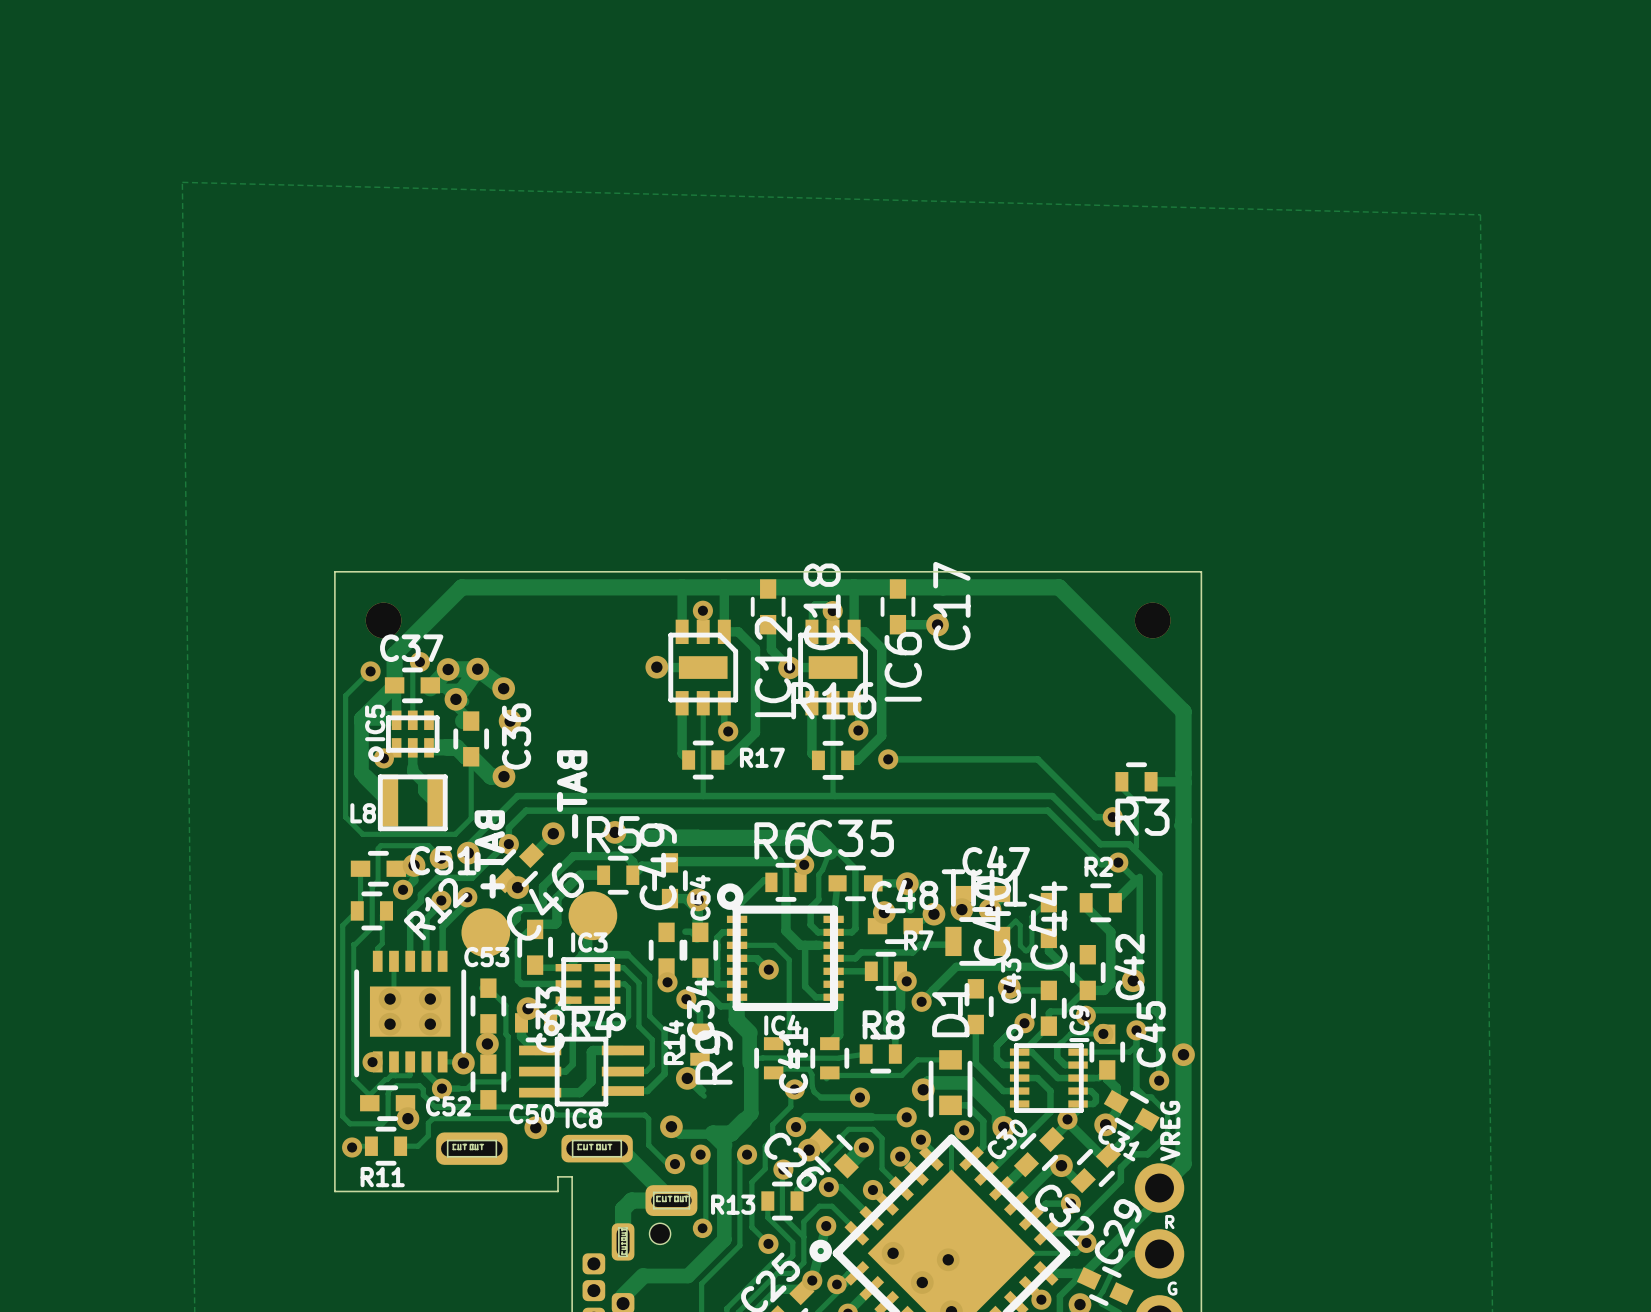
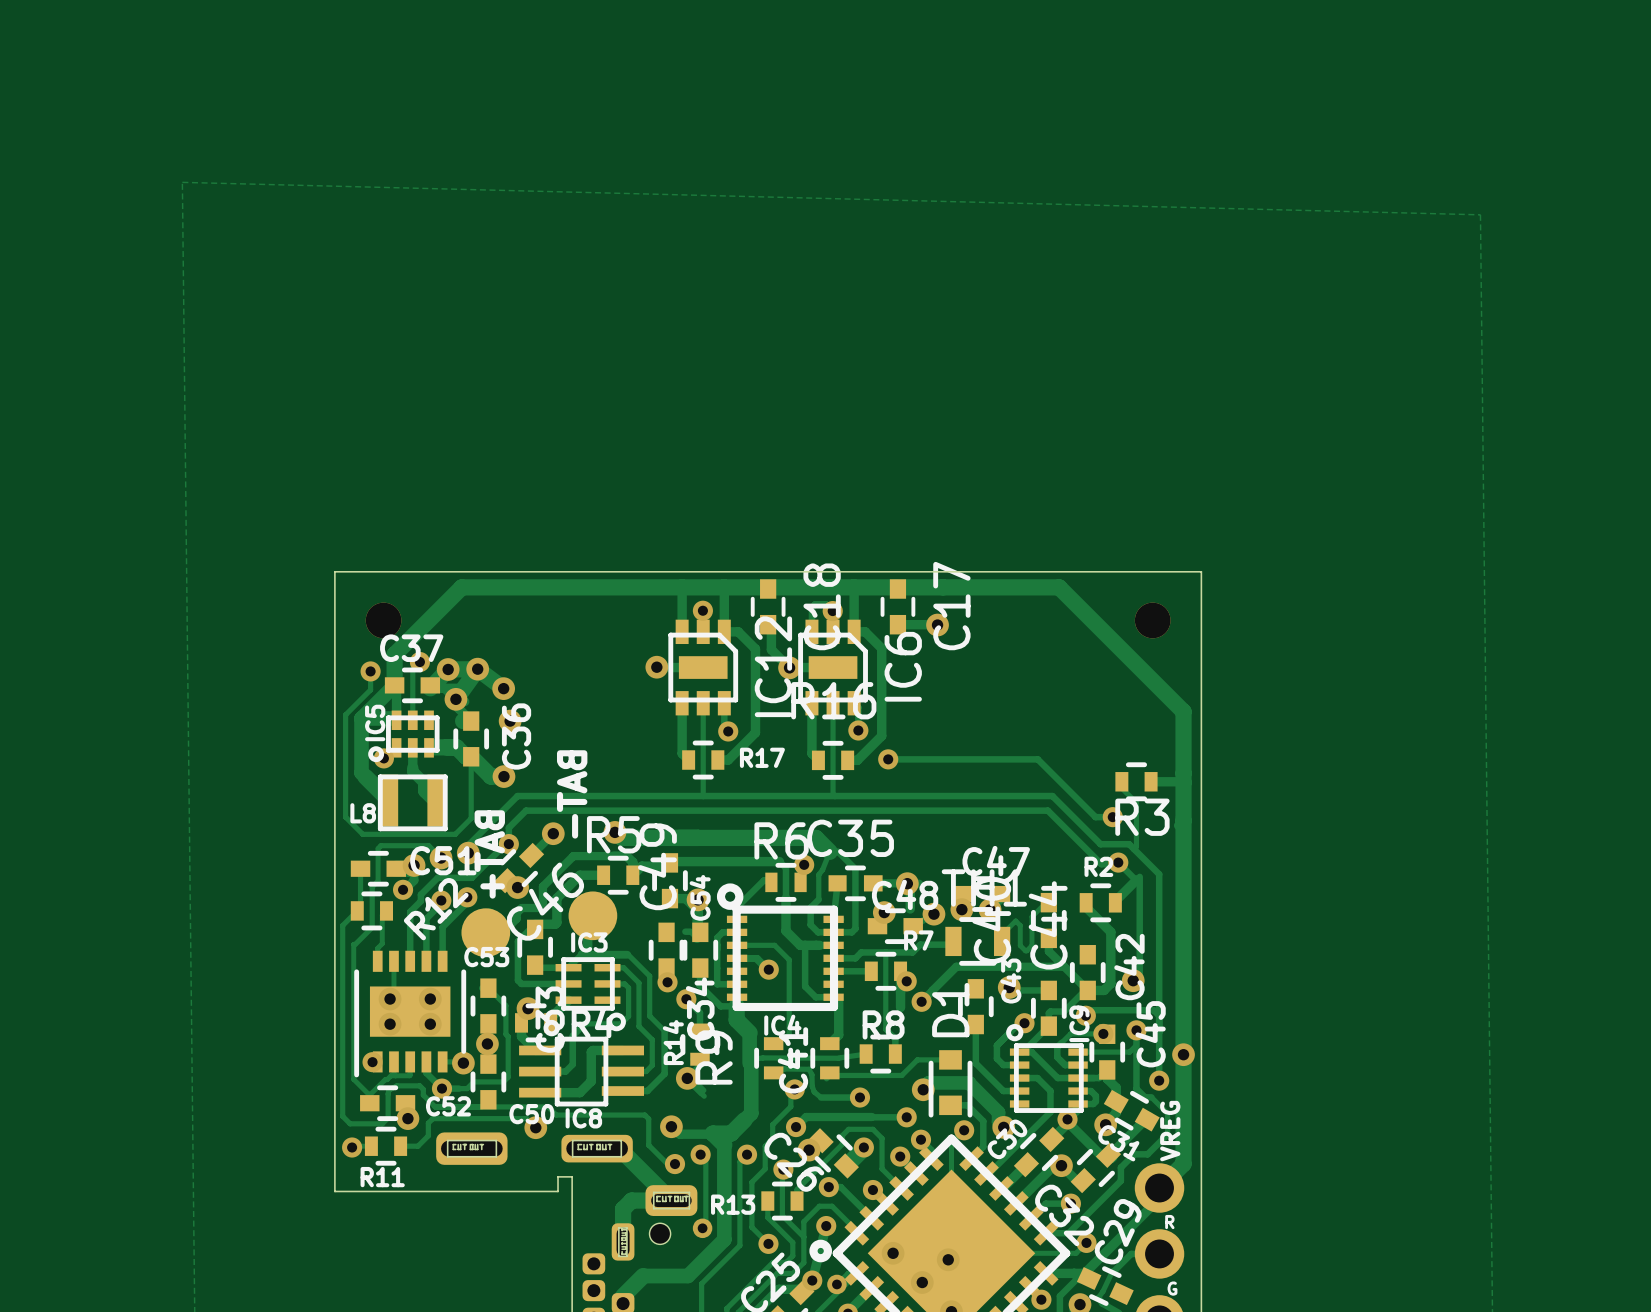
track: (369, 671) (345, 695) (345, 714) -> (370, 671) (370, 689) (345, 714)

